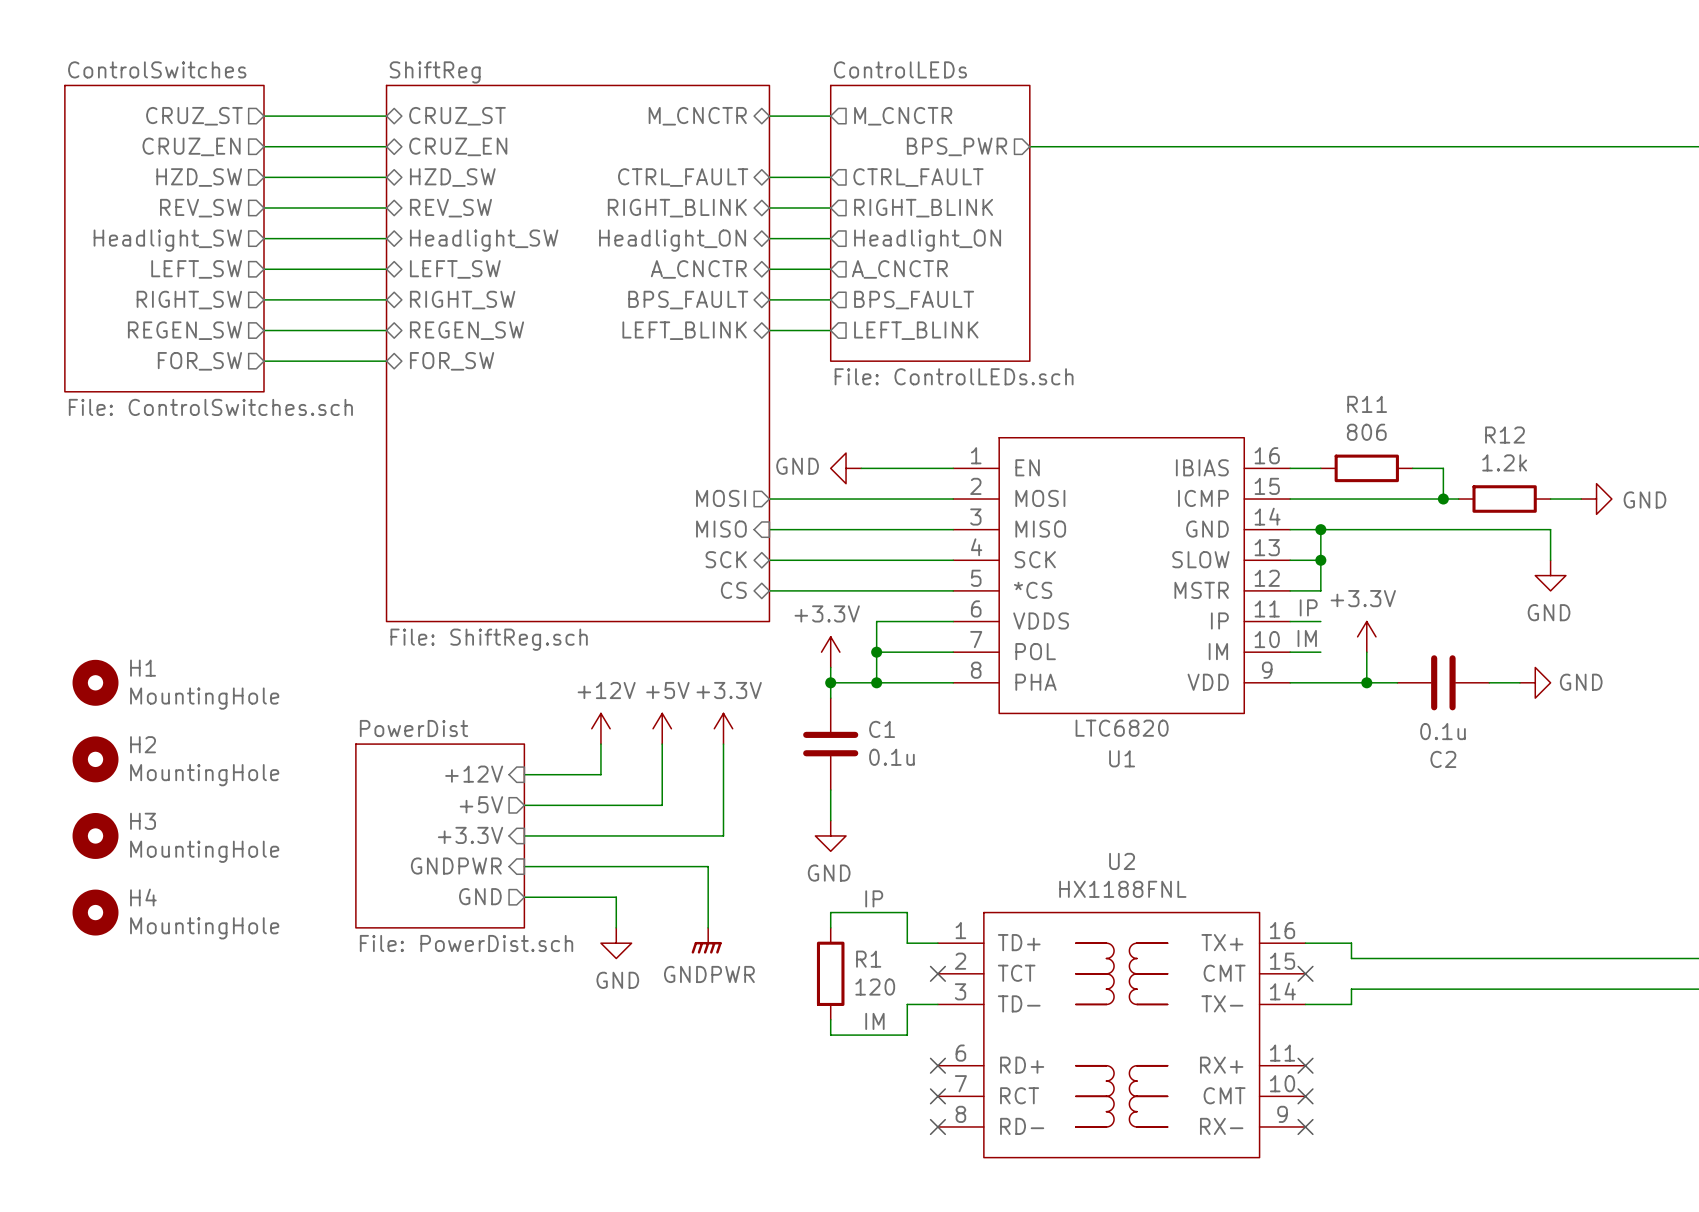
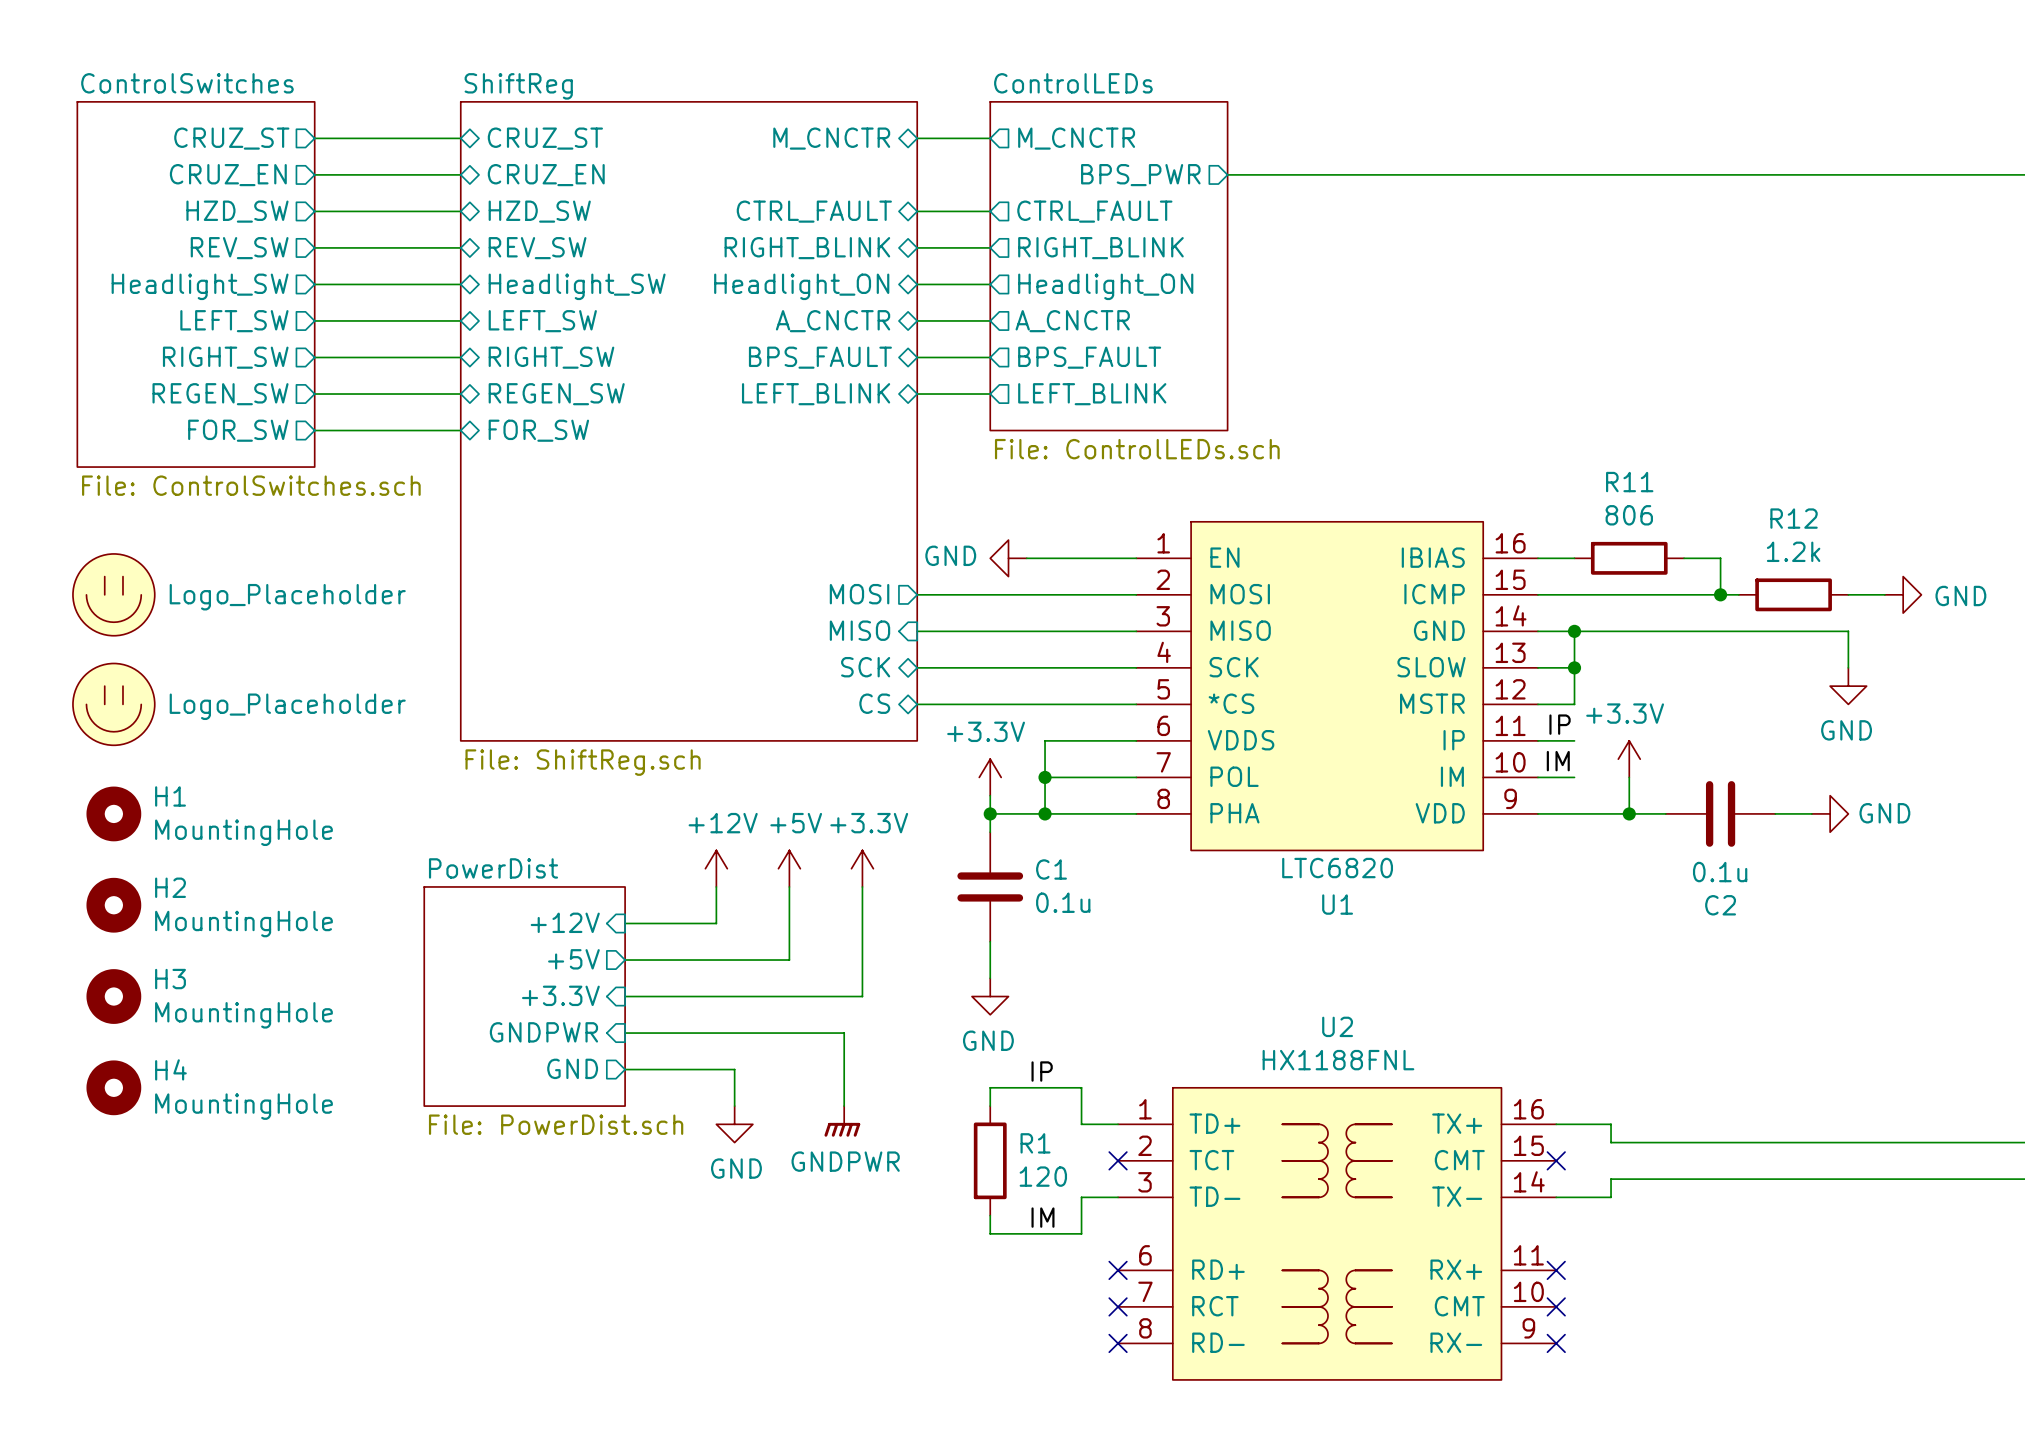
part: none -> Logo_Placeholder (113, 594)
part: none -> Logo_Placeholder (113, 704)

